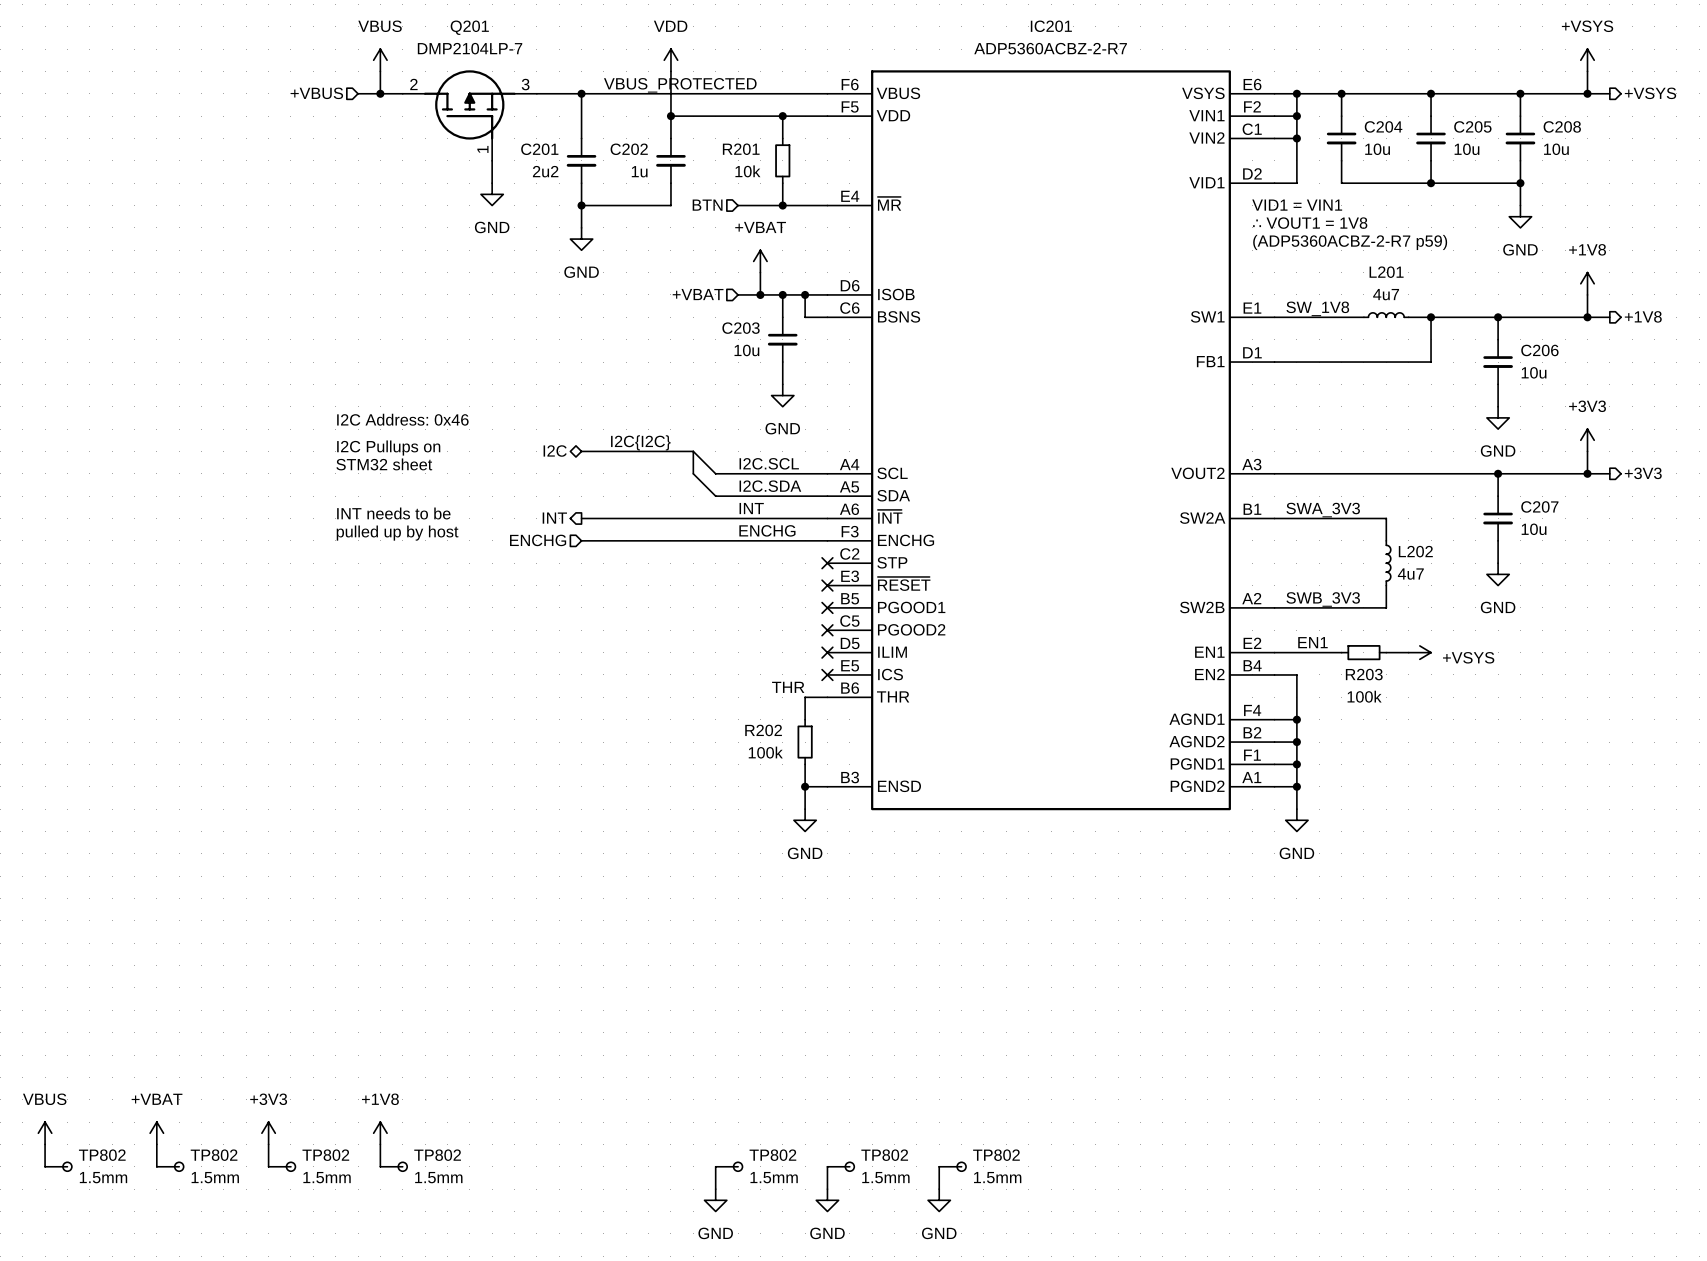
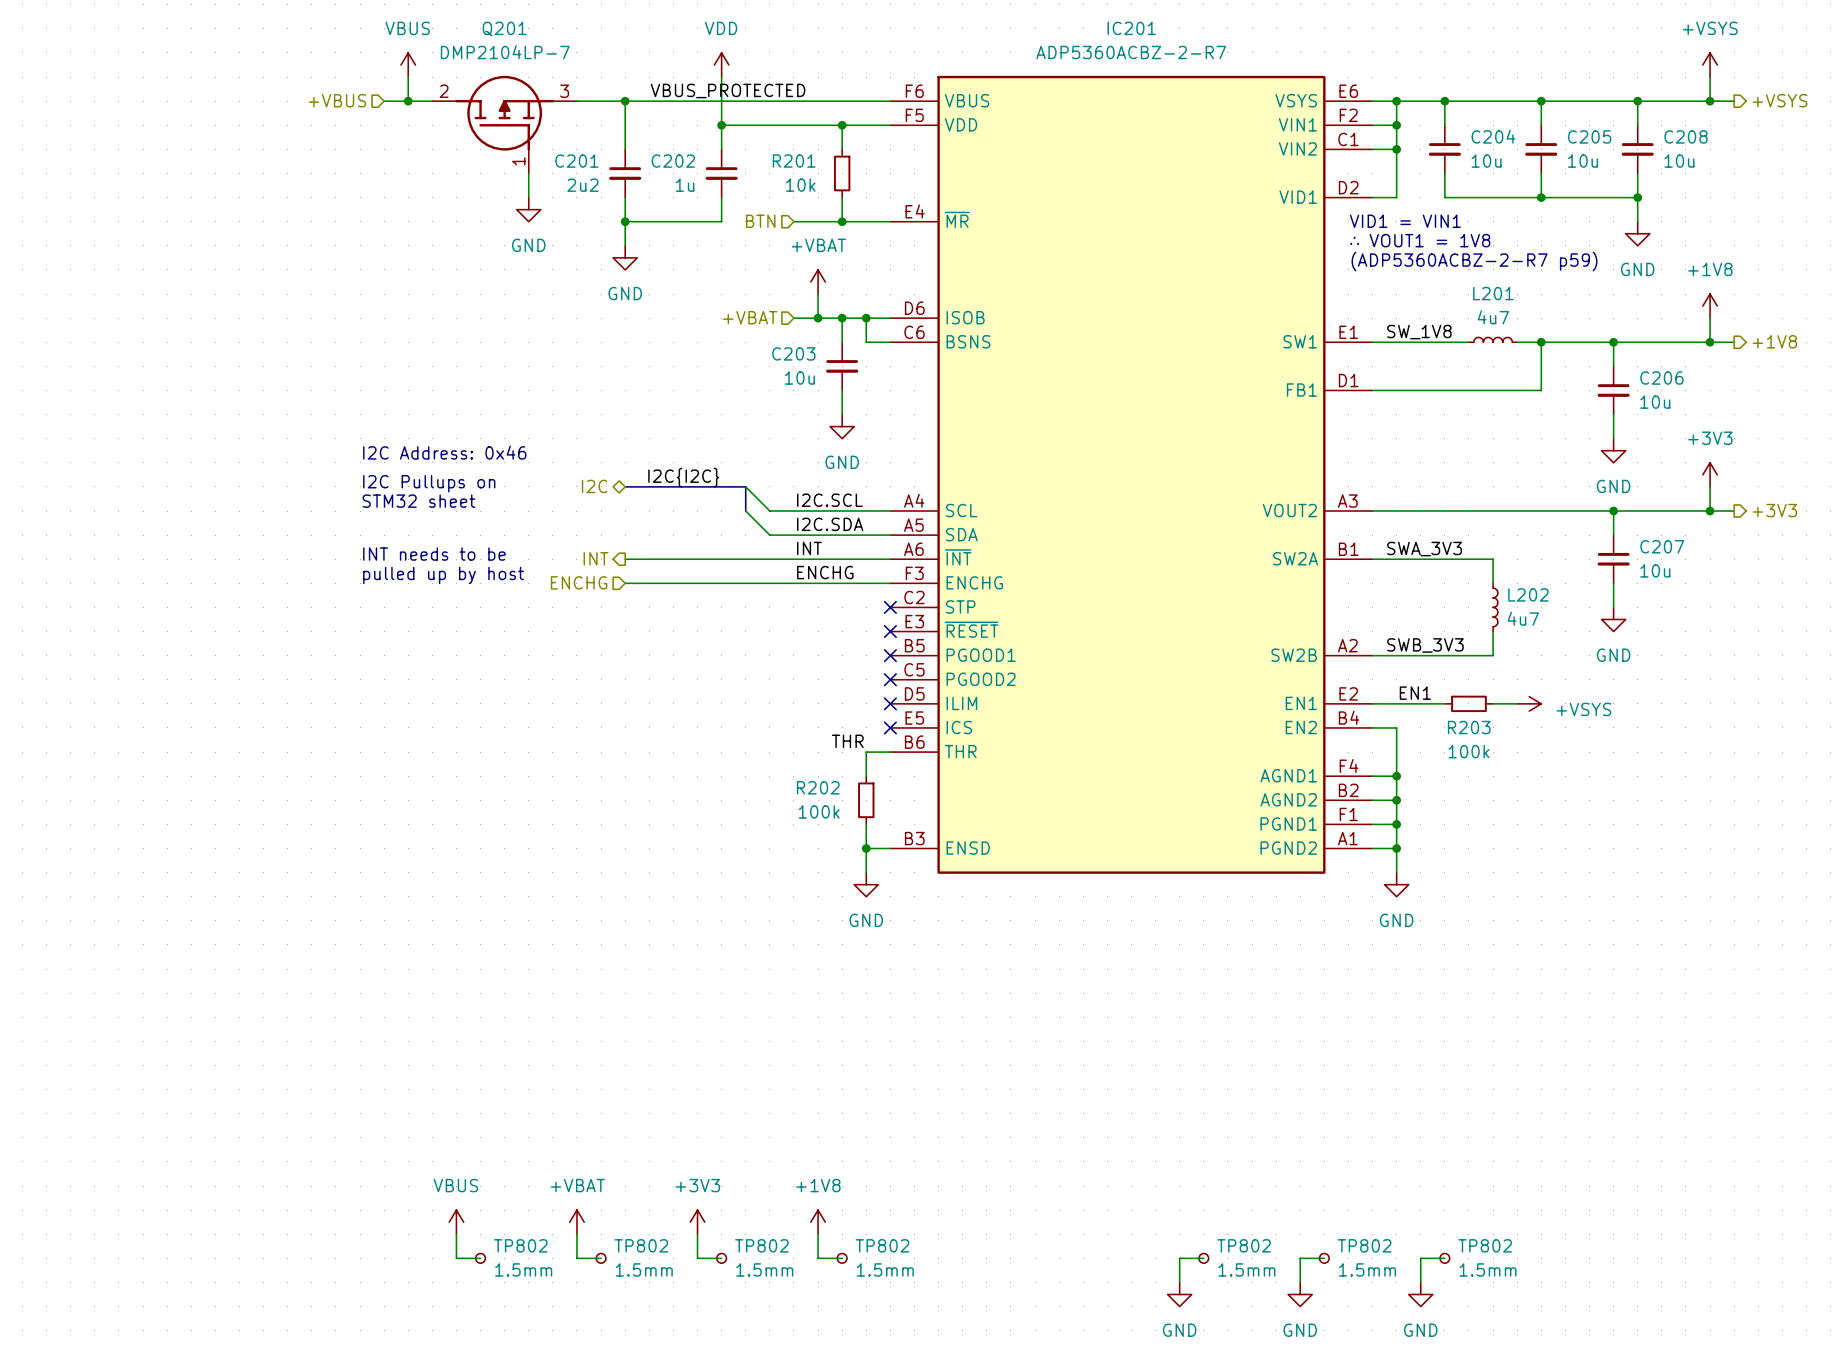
power symbol: VBUS (45, 1133) -> none
power symbol: +VBAT (156, 1133) -> none
power symbol: +3V3 (268, 1133) -> none
power symbol: +1V8 (380, 1133) -> none
power symbol: none -> VBUS (456, 1222)
power symbol: none -> +VBAT (576, 1222)
power symbol: none -> +3V3 (697, 1222)
power symbol: none -> +1V8 (818, 1222)
wire: (45, 1144) (45, 1166) (67, 1166) -> none
wire: (156, 1144) (156, 1166) (179, 1166) -> none
wire: (268, 1144) (268, 1166) (290, 1166) -> (456, 1234) (456, 1258) (480, 1258)
wire: (380, 1144) (380, 1166) (402, 1166) -> (576, 1234) (576, 1258) (601, 1258)
wire: none -> (697, 1234) (697, 1258) (721, 1258)
wire: none -> (818, 1234) (818, 1258) (842, 1258)
TP802: 1.5mm (67, 1166) -> none
TP802: 1.5mm (179, 1166) -> none
TP802: 1.5mm (290, 1166) -> none
TP802 position: (402, 1166) -> (480, 1258)
TP802: none -> 1.5mm (601, 1258)
TP802: none -> 1.5mm (721, 1258)
wire: (738, 1166) (715, 1166) (715, 1189) -> none
TP802: 1.5mm (738, 1166) -> none
TP802: none -> 1.5mm (842, 1258)
wire: (849, 1166) (827, 1166) (827, 1189) -> none
TP802: 1.5mm (849, 1166) -> none
wire: (961, 1166) (939, 1166) (939, 1189) -> (1203, 1258) (1179, 1258) (1179, 1282)
TP802: 1.5mm (961, 1166) -> none
TP802: none -> 1.5mm (1203, 1258)
wire: none -> (1324, 1258) (1300, 1258) (1300, 1282)
TP802: none -> 1.5mm (1324, 1258)
wire: none -> (1444, 1258) (1420, 1258) (1420, 1282)
TP802: none -> 1.5mm (1444, 1258)
power symbol: GND (715, 1200) -> none
power symbol: GND (827, 1200) -> none
power symbol: GND (939, 1200) -> none
power symbol: none -> GND (1179, 1294)
power symbol: none -> GND (1300, 1294)
power symbol: none -> GND (1420, 1294)

